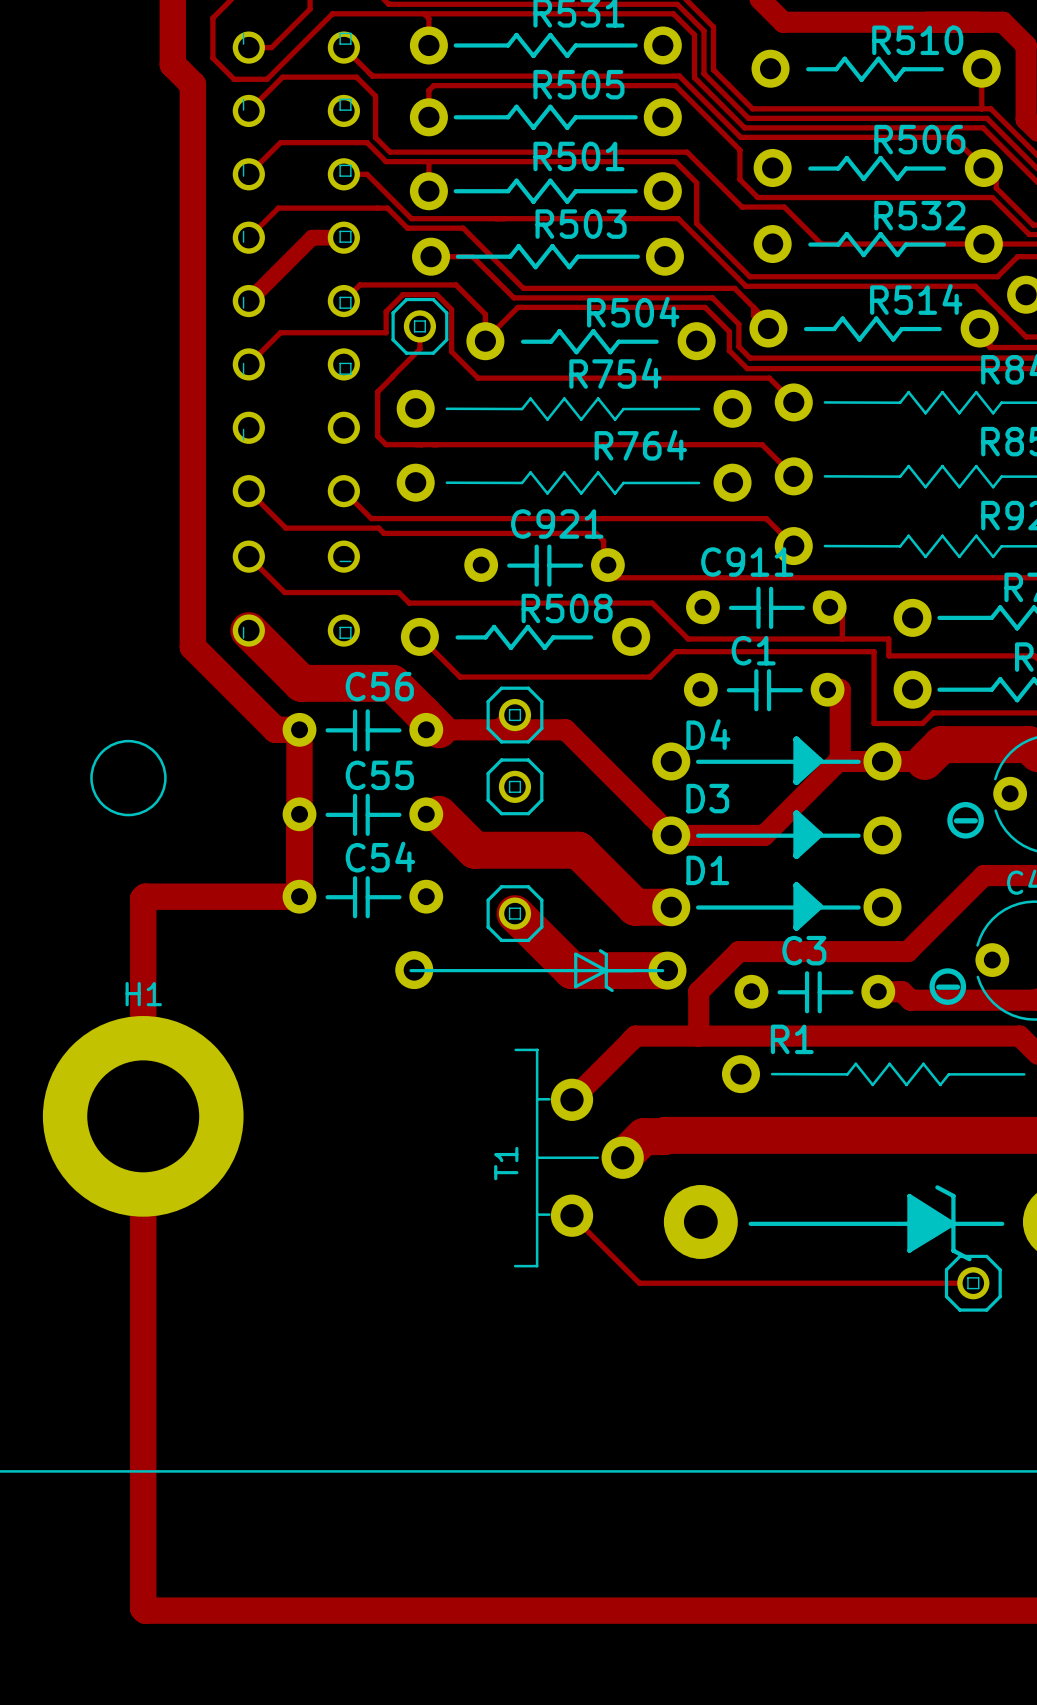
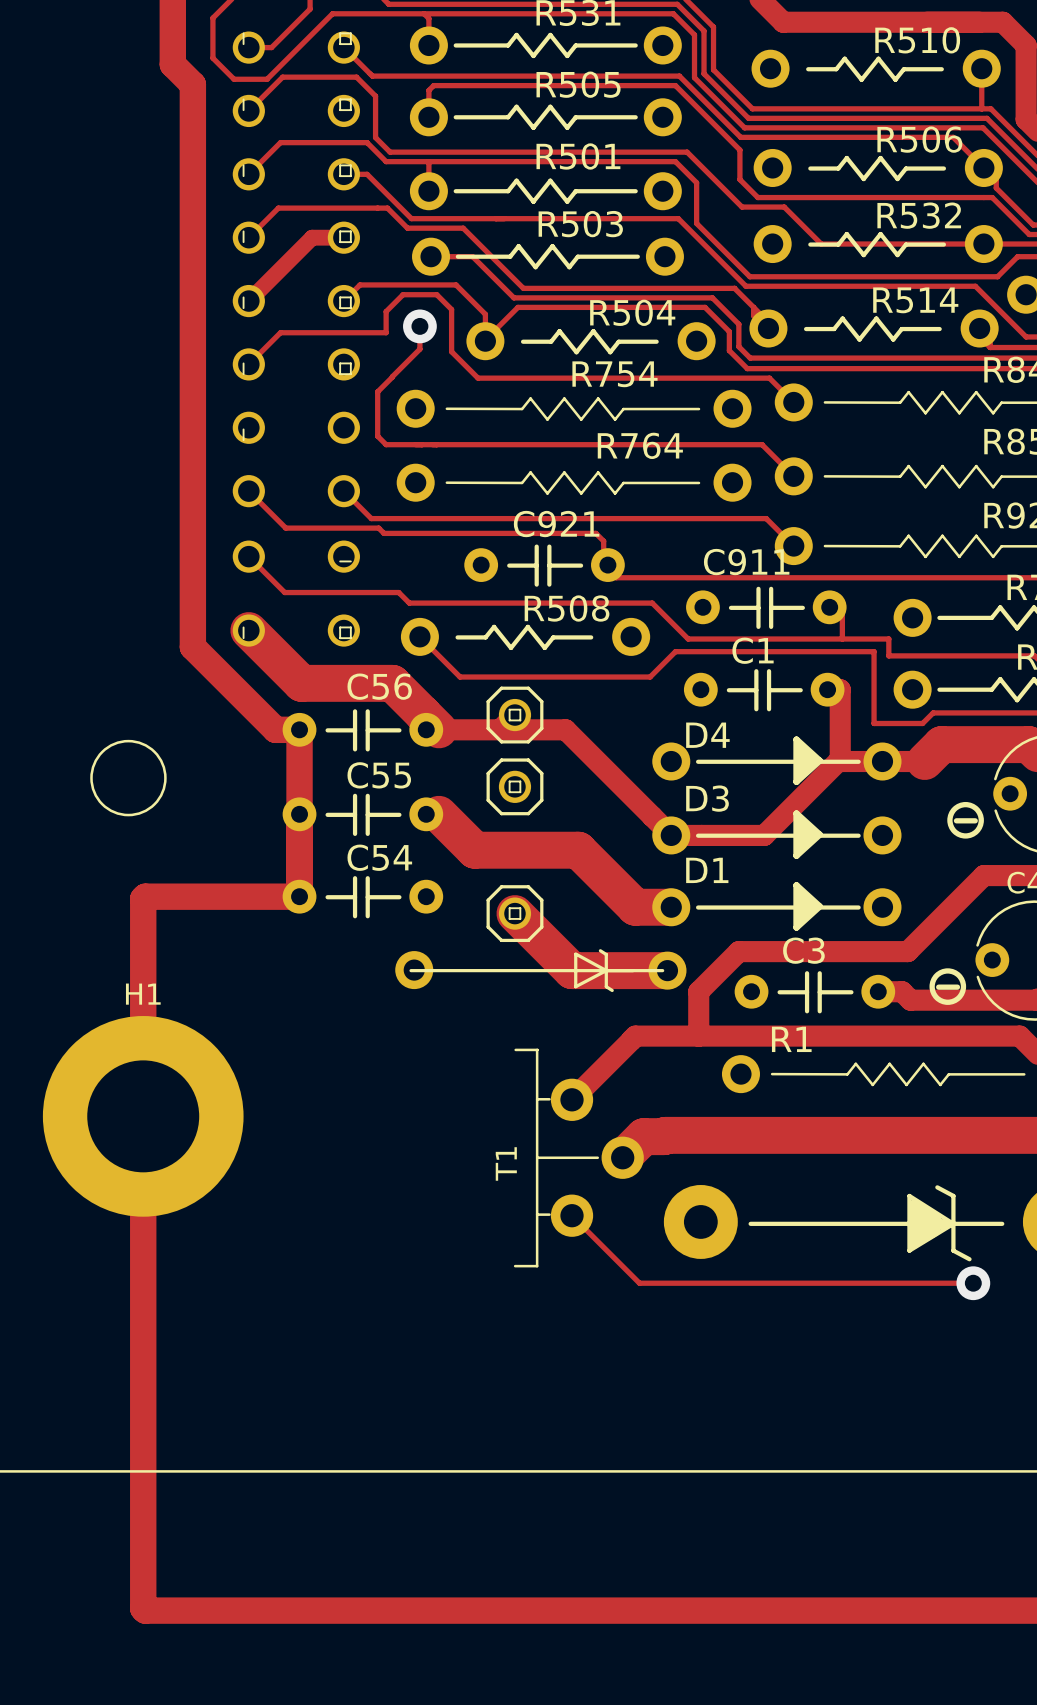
part: (419, 326) -> none
via: none -> (419, 326)
part: (973, 1283) -> none
via: none -> (973, 1283)

